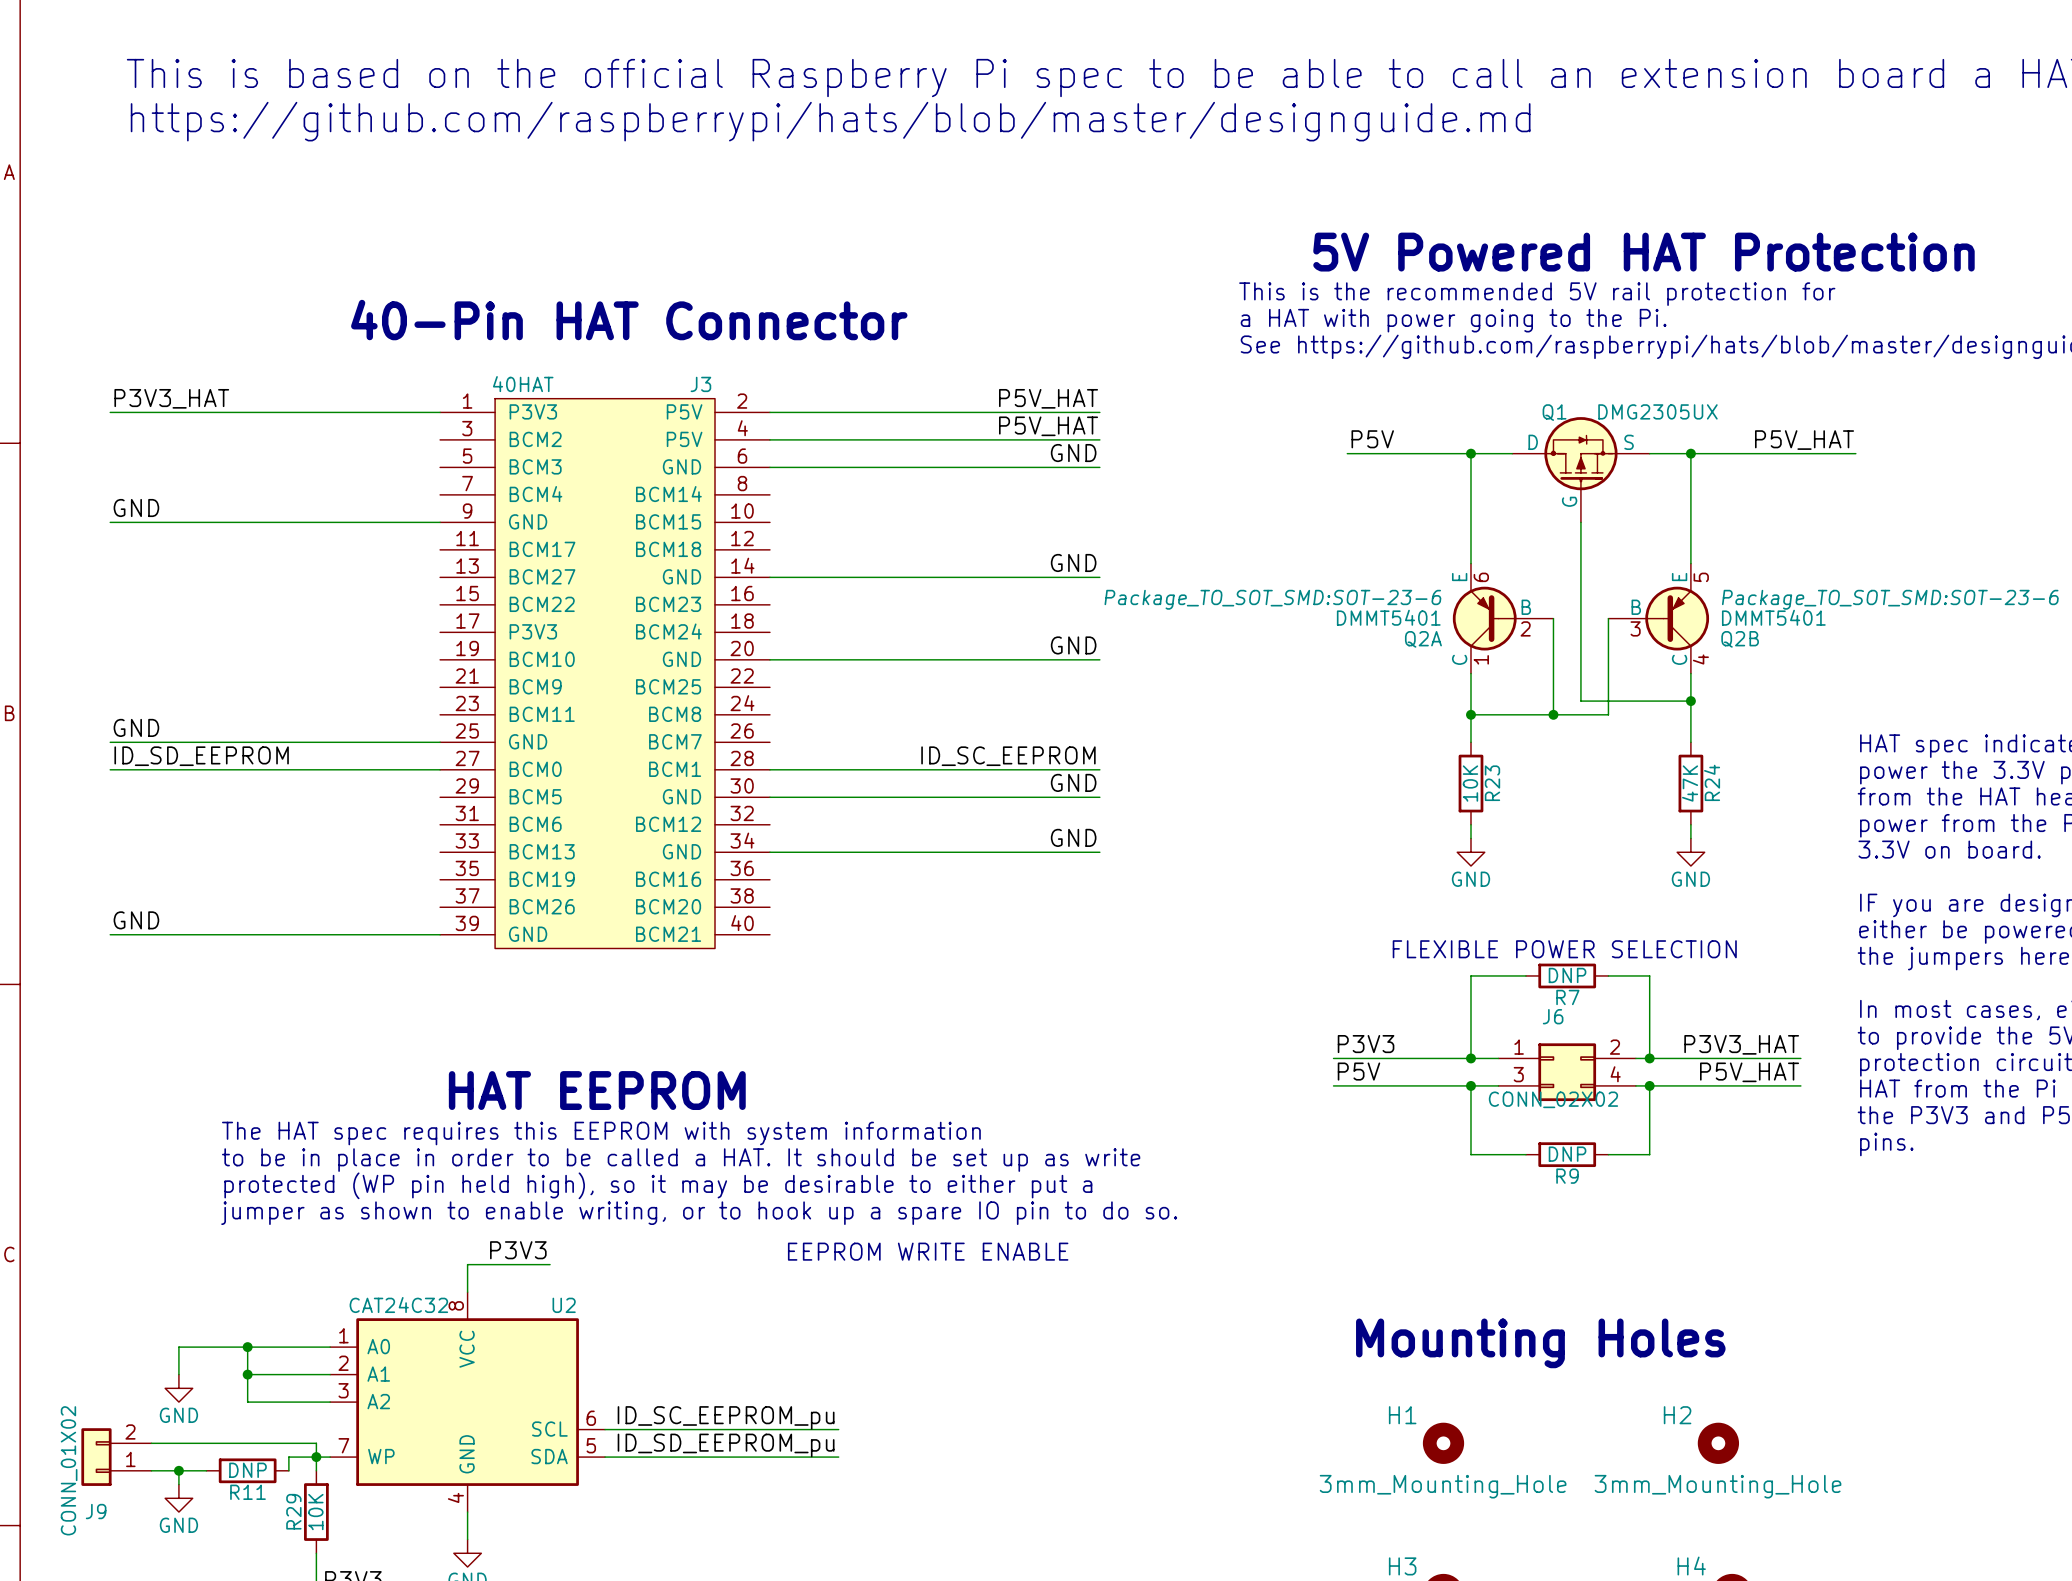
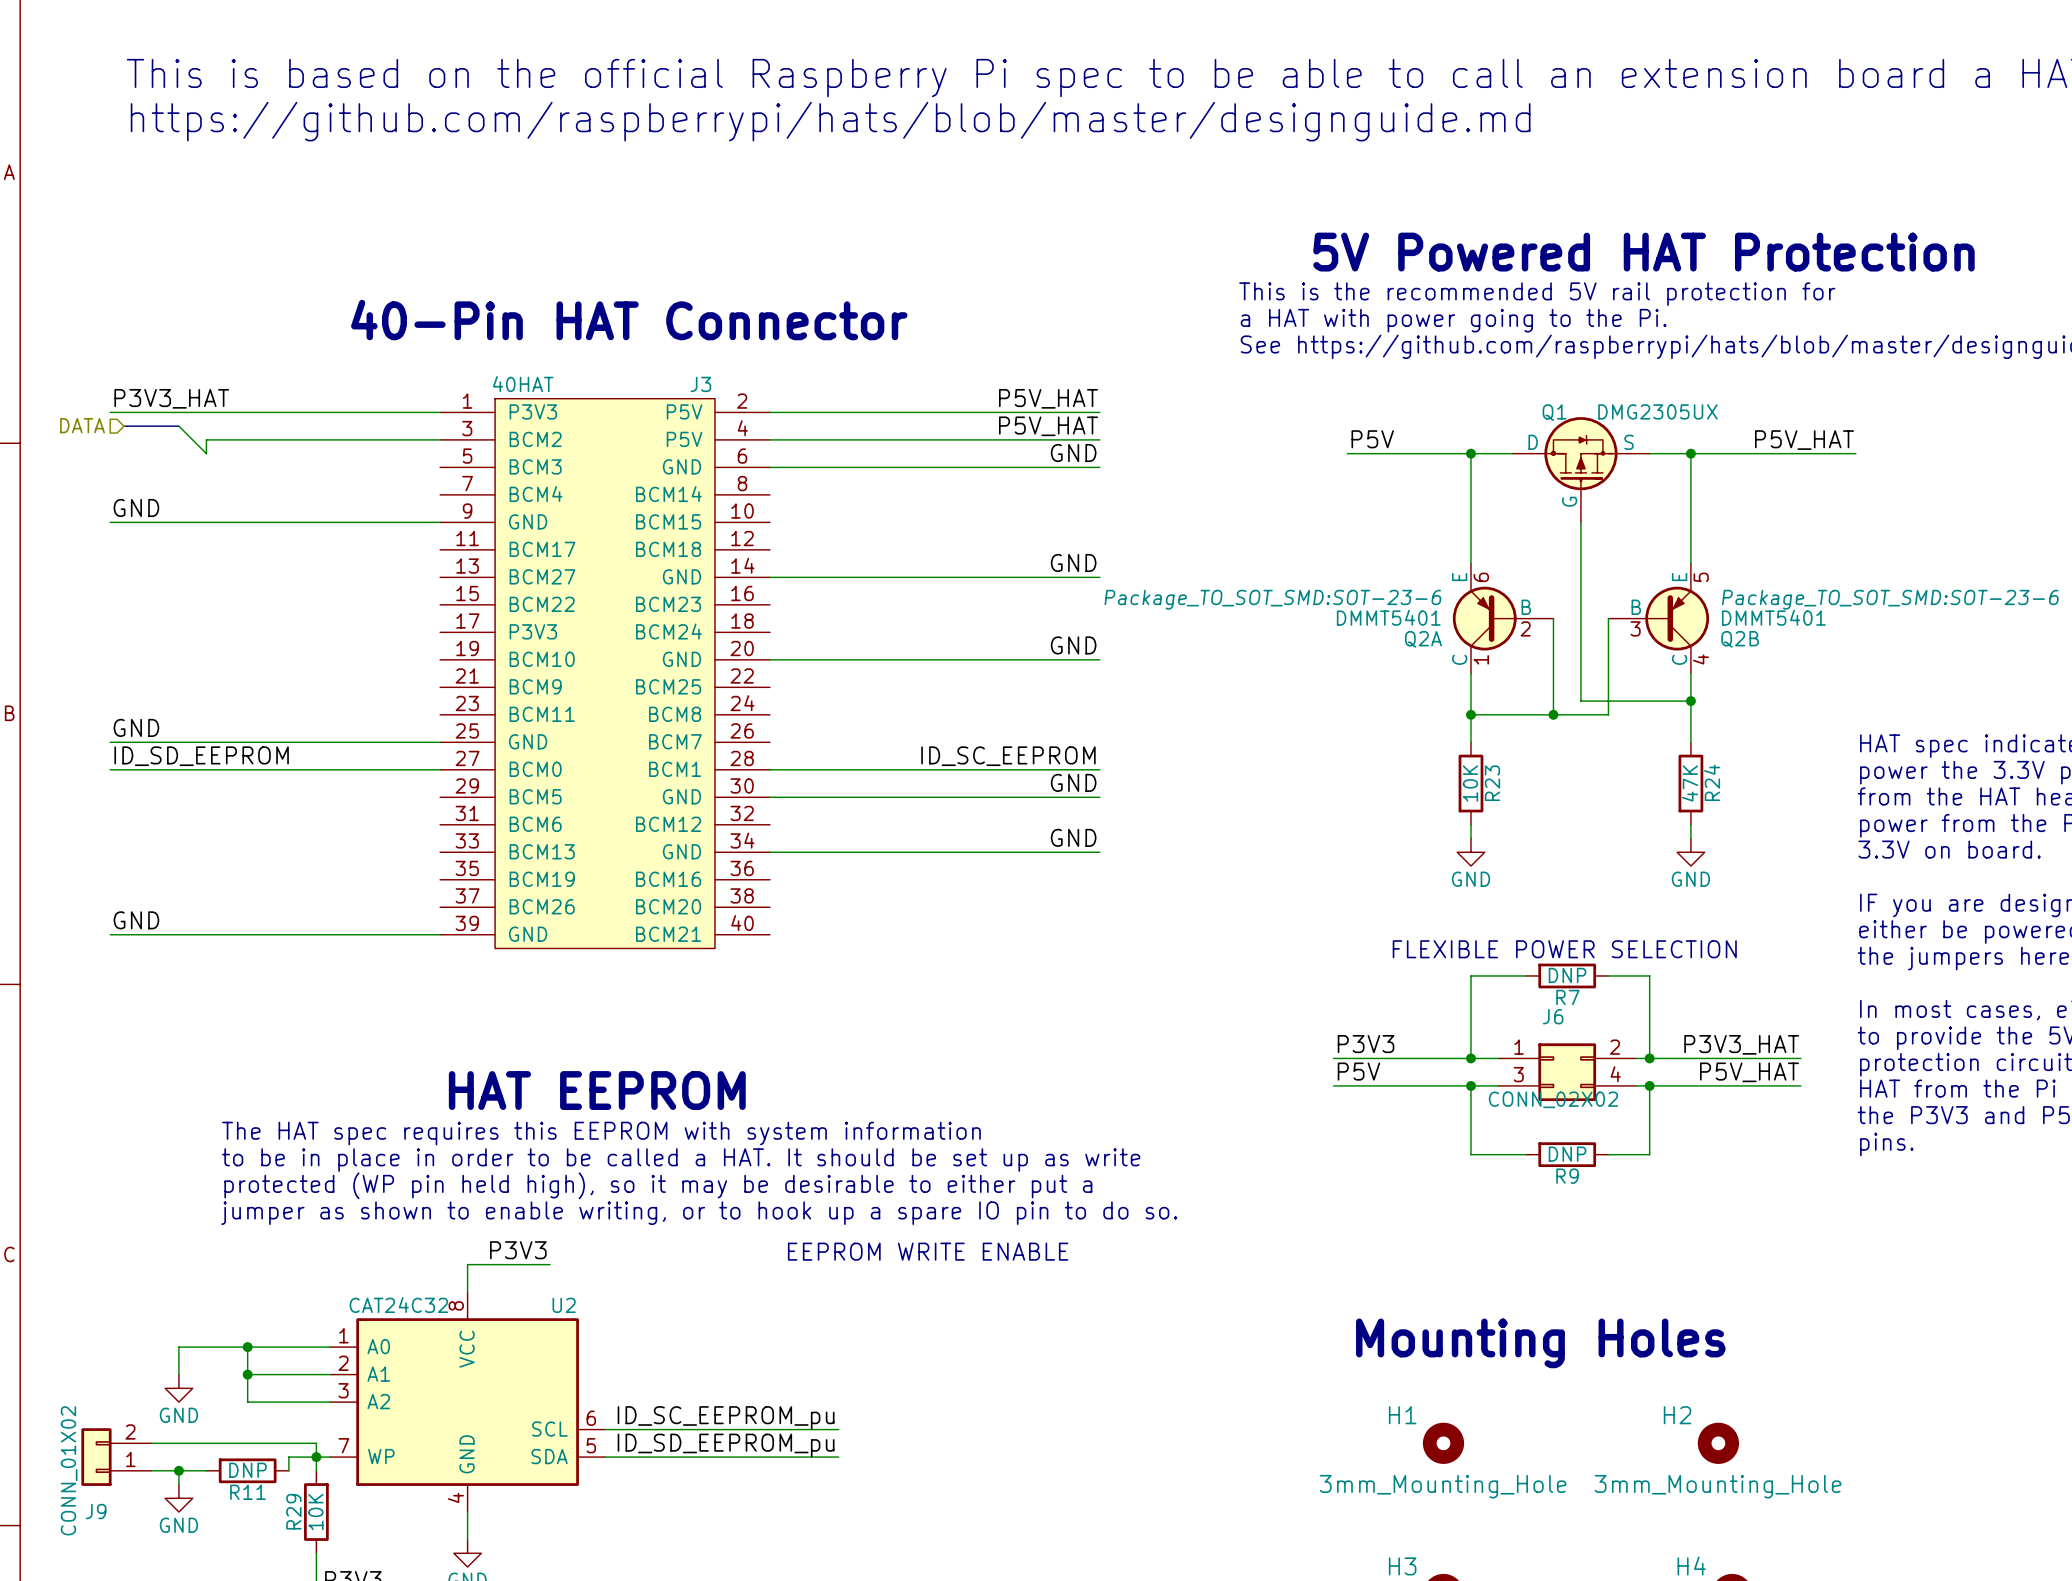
hierarchical label: none -> DATA (82, 425)
bus: none -> (123, 426) (178, 426)
wire: none -> (178, 426) (206, 453) (206, 439) (440, 439)

